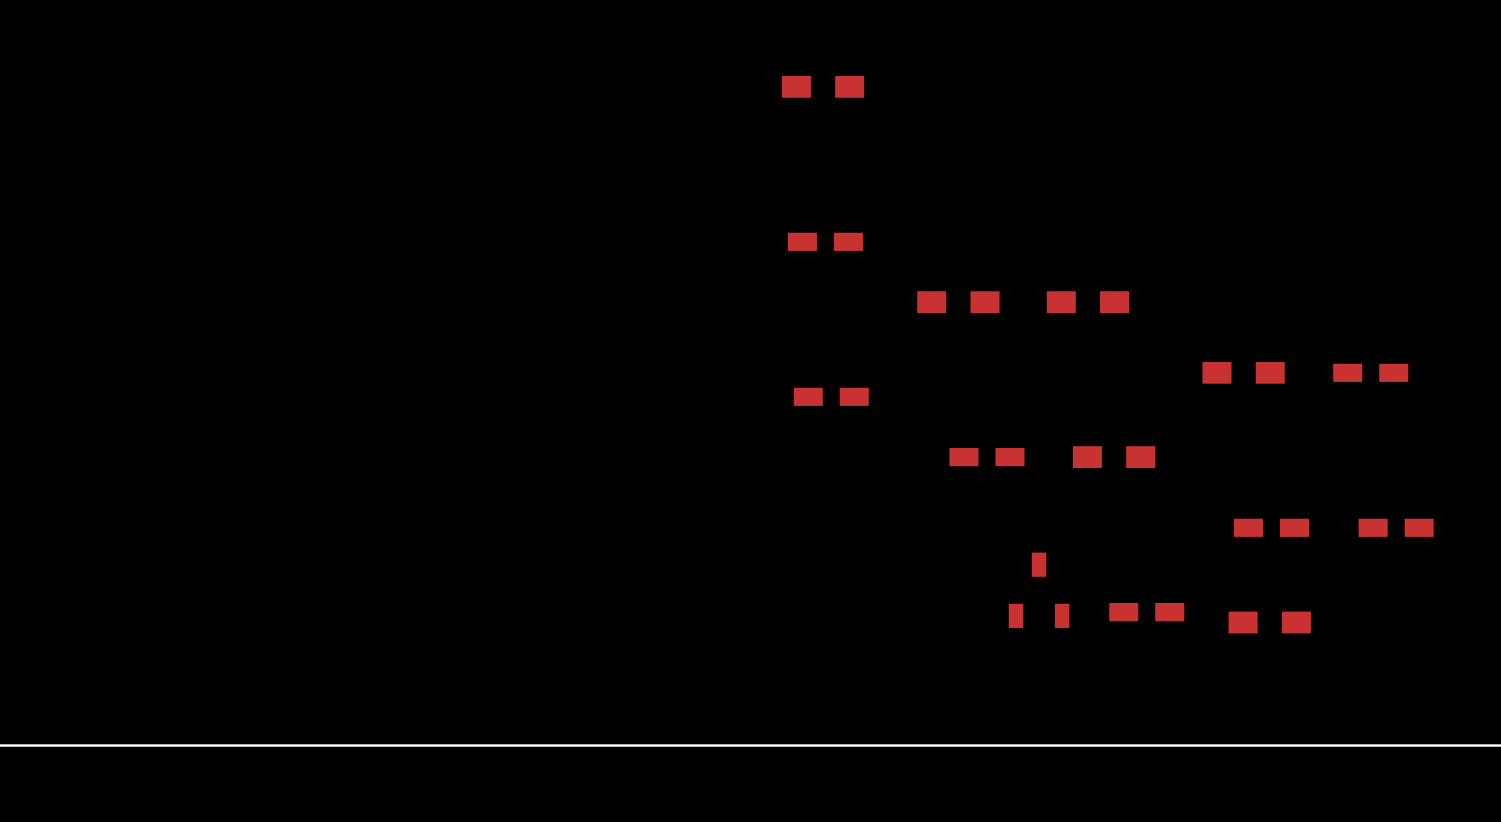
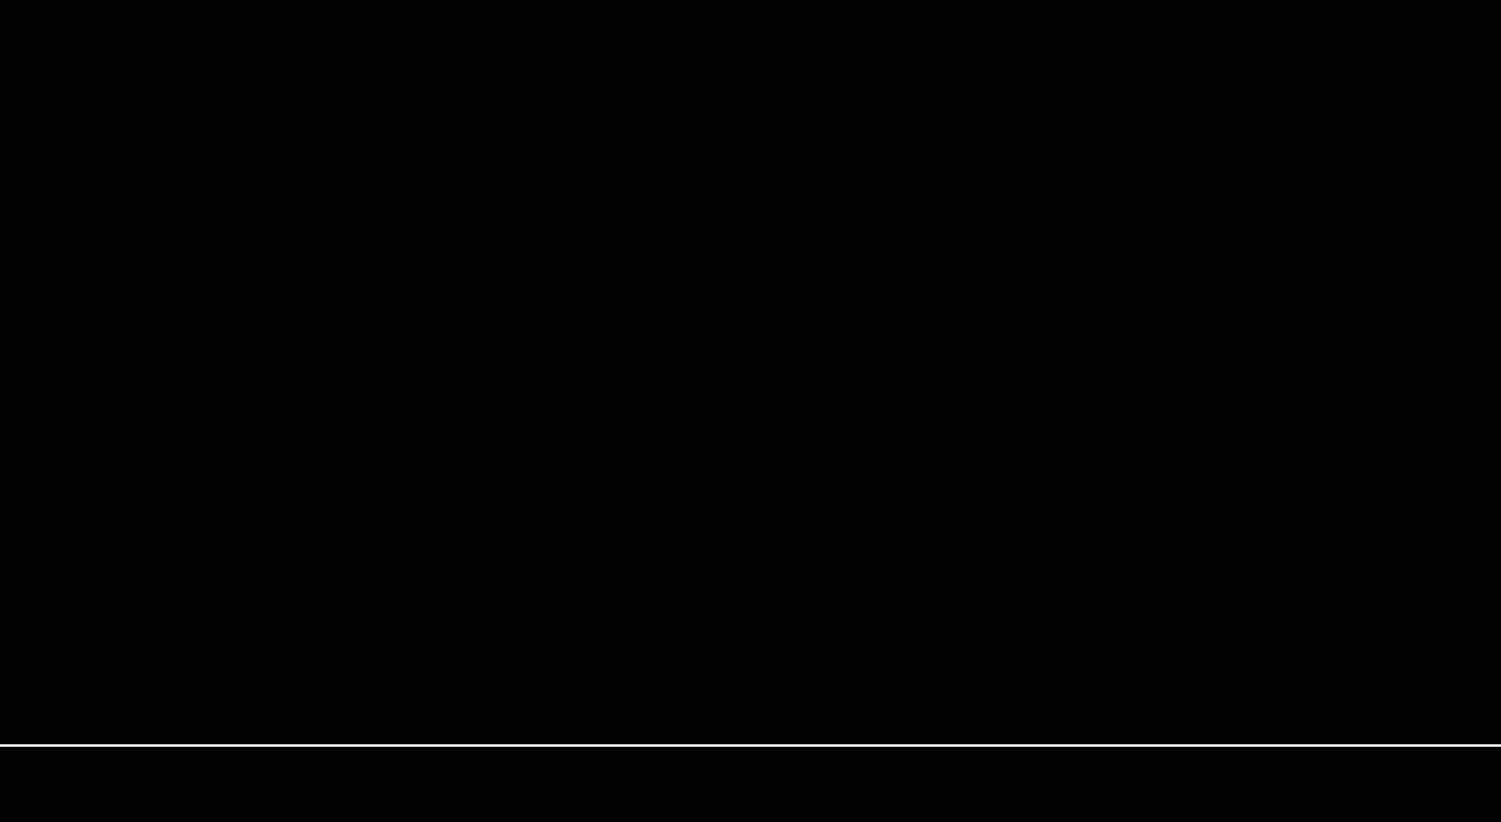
part: (823, 86) -> none
part: (825, 241) -> none
part: (958, 302) -> none
part: (1087, 302) -> none
part: (1243, 372) -> none
part: (1370, 372) -> none
part: (831, 396) -> none
part: (986, 457) -> none
part: (1114, 457) -> none
part: (1271, 527) -> none
part: (1396, 527) -> none
part: (1039, 590) -> none
part: (1146, 612) -> none
part: (1269, 622) -> none

